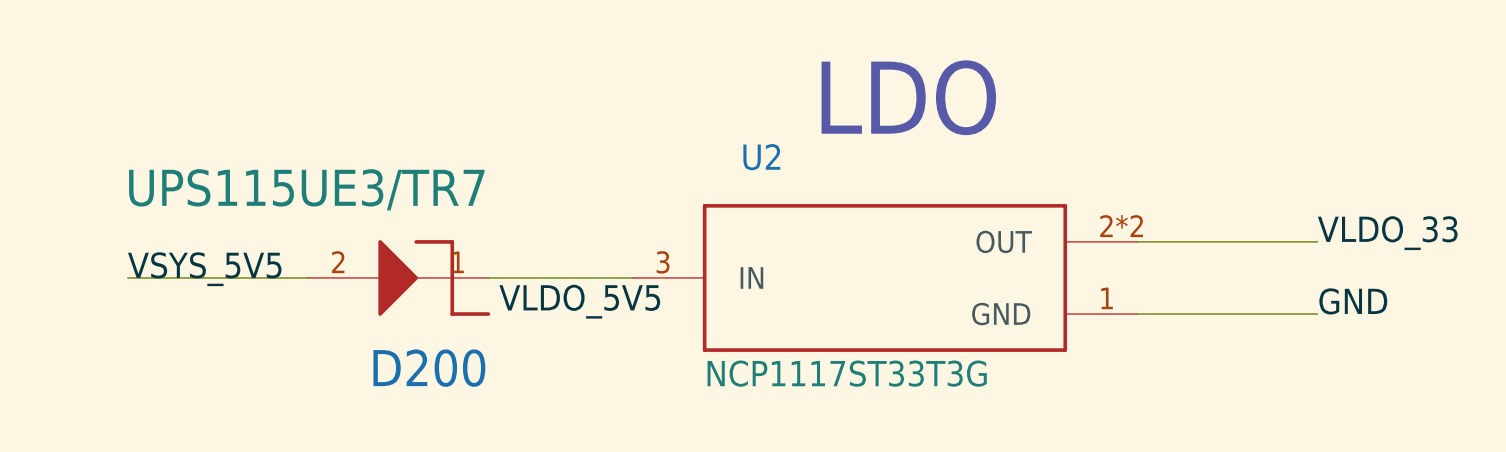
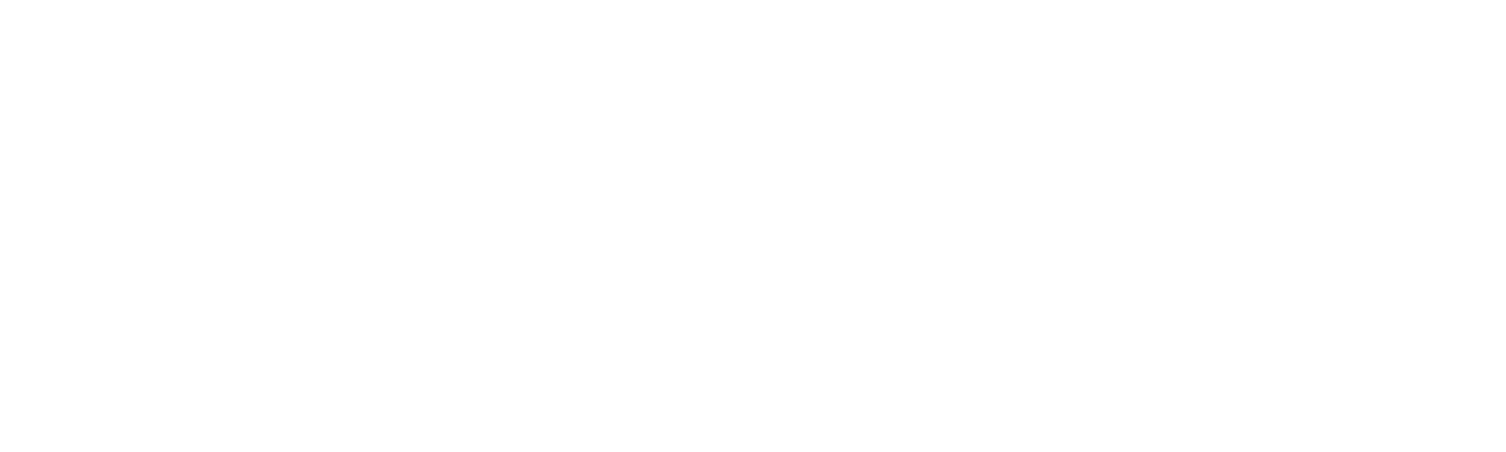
text: LDO (908, 97) -> none
label: VLDO_33 (1387, 233) -> none
wire: (1137, 241) (1317, 241) -> none
label: VSYS_5V5 (204, 269) -> none
wire: (127, 277) (308, 277) -> none
D200: UPS115UE3/TR7 (399, 277) -> none
wire: (488, 277) (632, 277) -> none
U2: NCP1117ST33T3G (884, 277) -> none
label: VLDO_5V5 (579, 301) -> none
label: GND (1353, 301) -> none
wire: (1137, 314) (1317, 314) -> none

